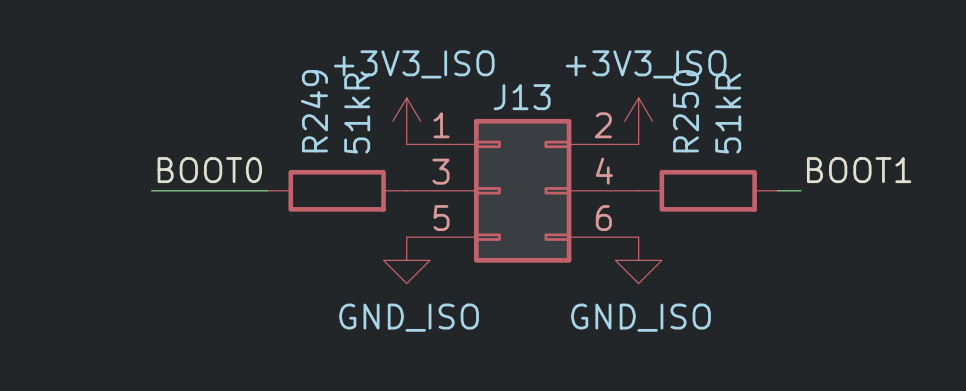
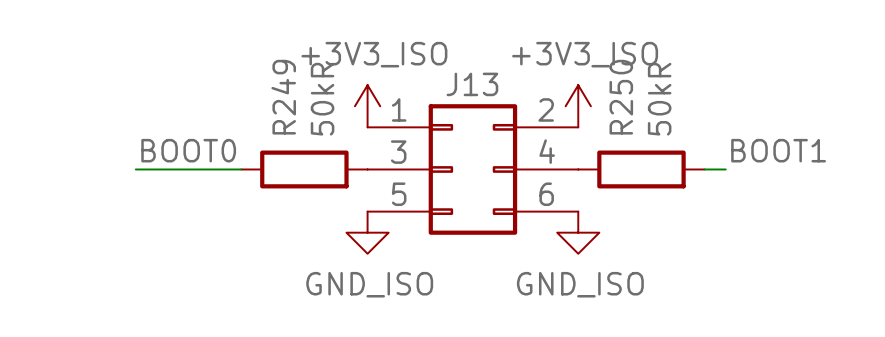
R249 value: 51kR (357, 113) -> 50kR (322, 99)
R250 value: 51kR (728, 113) -> 50kR (659, 99)

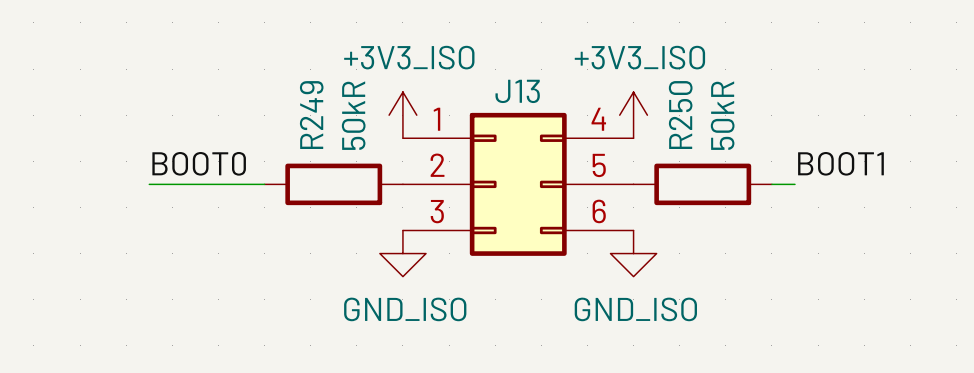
J13 pin number: 2 (546, 109) -> 4 (598, 119)
J13 pin number: 4 (547, 151) -> 5 (599, 165)
J13 pin number: 3 (398, 152) -> 2 (437, 165)
J13 pin number: 5 (399, 194) -> 3 (437, 211)

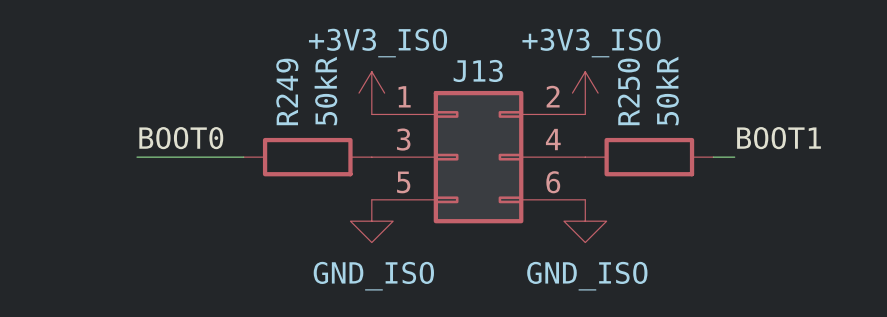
J13 pin number: 4 (598, 119) -> 2 (553, 96)
J13 pin number: 2 (437, 165) -> 3 (403, 139)
J13 pin number: 5 (599, 165) -> 4 (553, 139)
J13 pin number: 3 (437, 211) -> 5 (403, 182)

